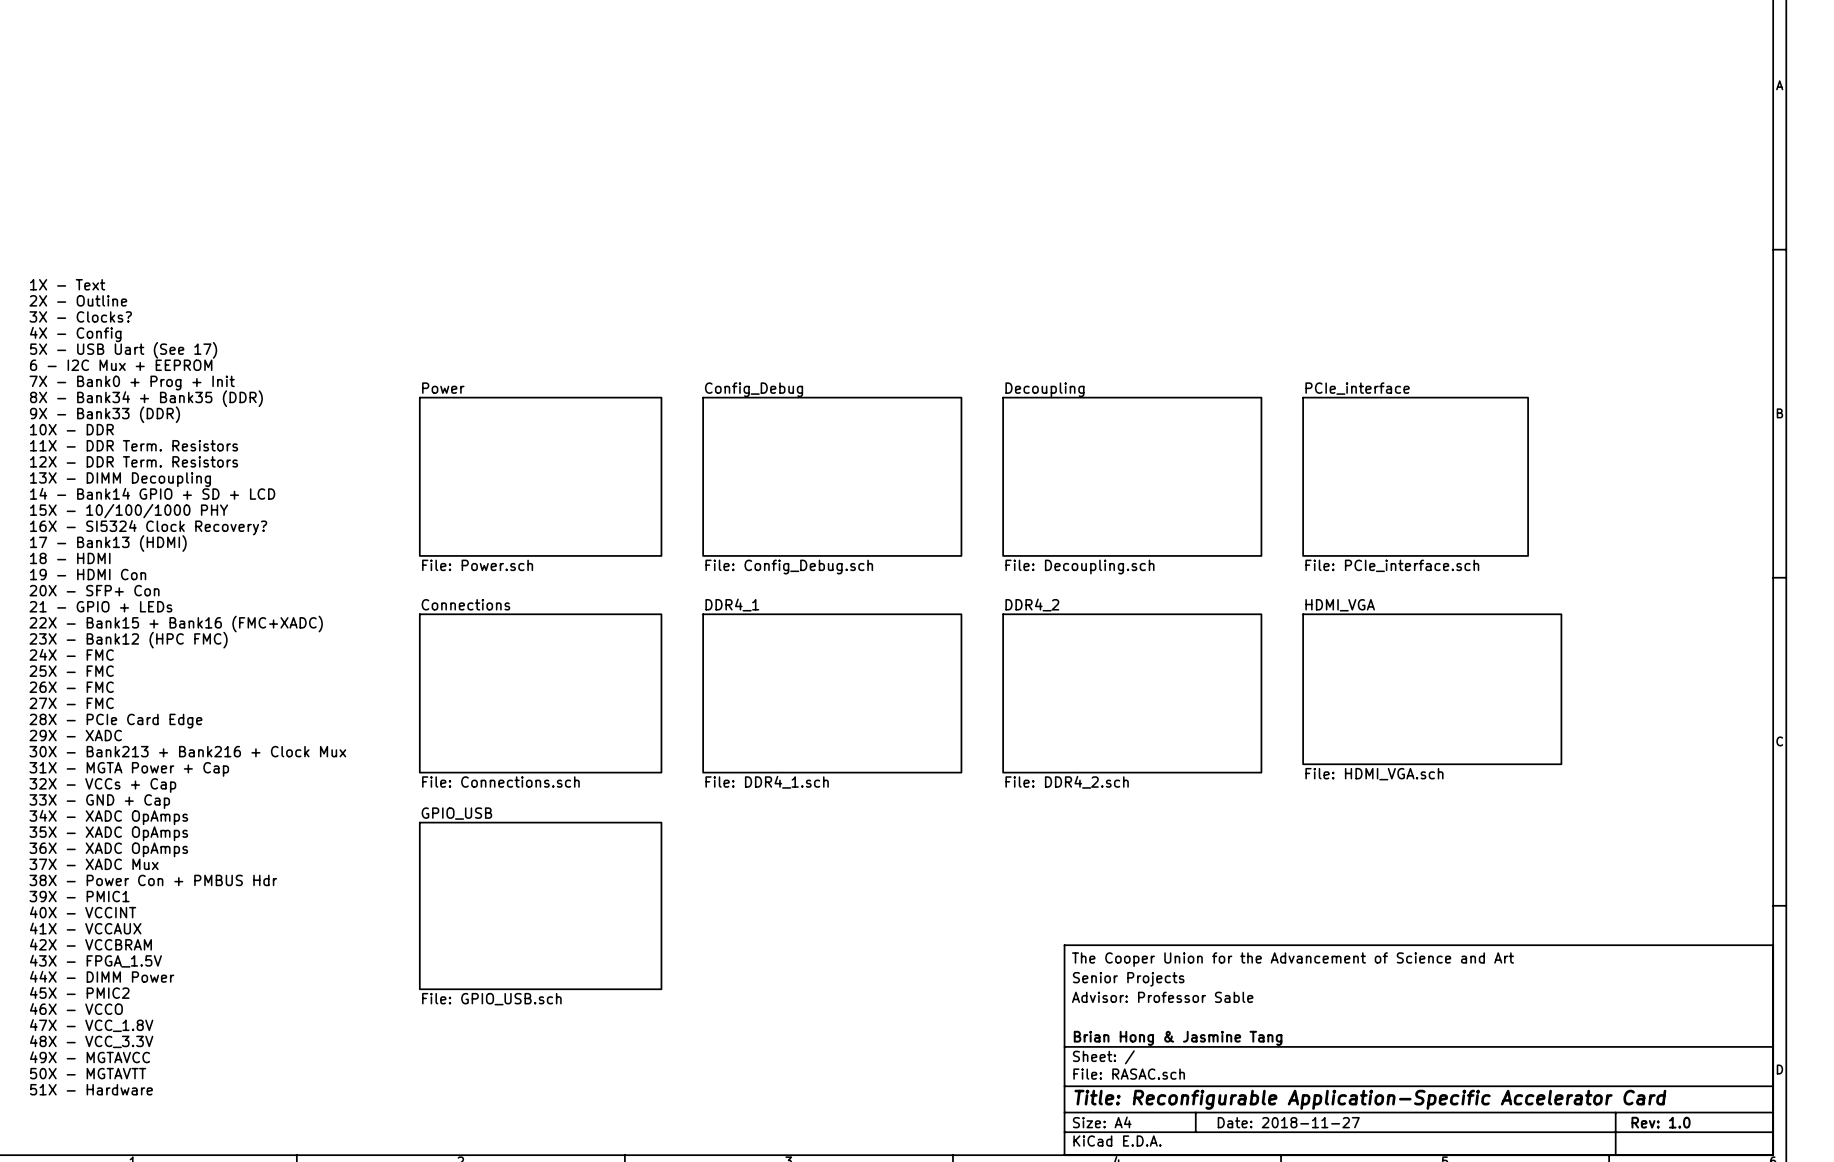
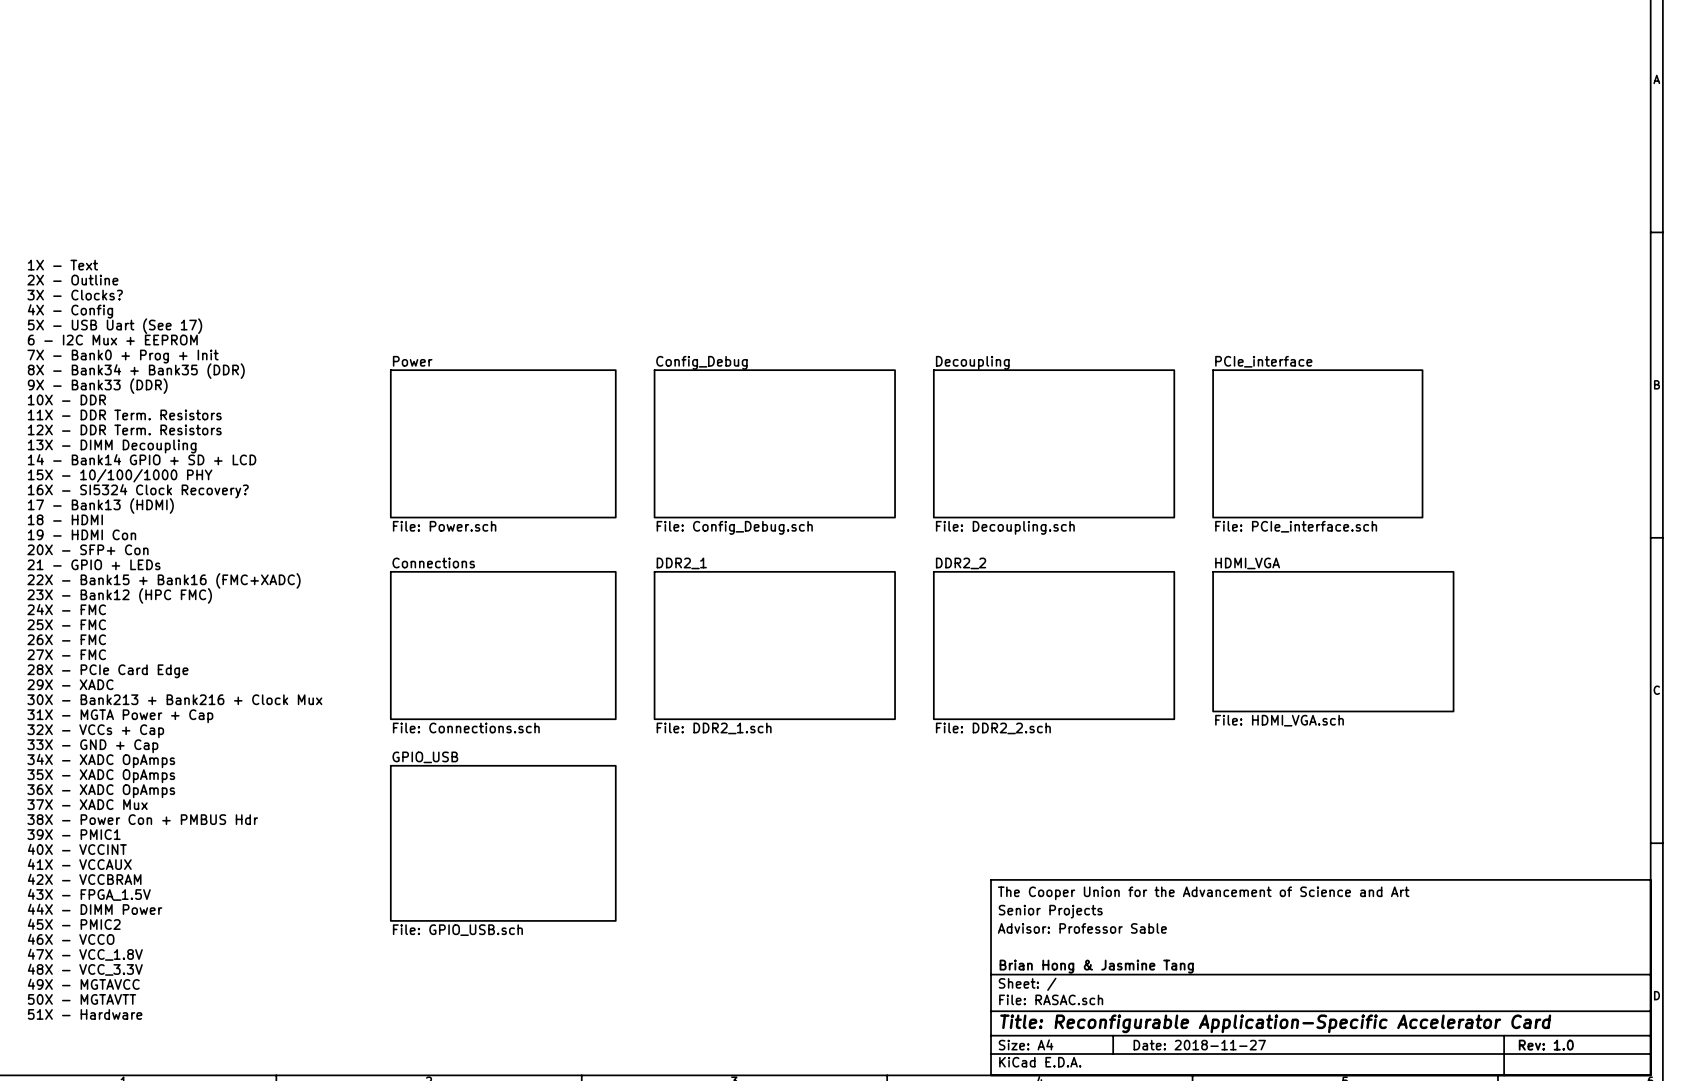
sheet DDR4_1 name: DDR4_1 (732, 605) -> DDR2_1 (681, 563)
sheet DDR4_2 name: DDR4_2 (1032, 605) -> DDR2_2 (961, 563)
sheet DDR4_1 value: File: DDR4_1.sch (767, 782) -> File: DDR2_1.sch (714, 728)
sheet DDR4_2 value: File: DDR4_2.sch (1067, 782) -> File: DDR2_2.sch (993, 728)

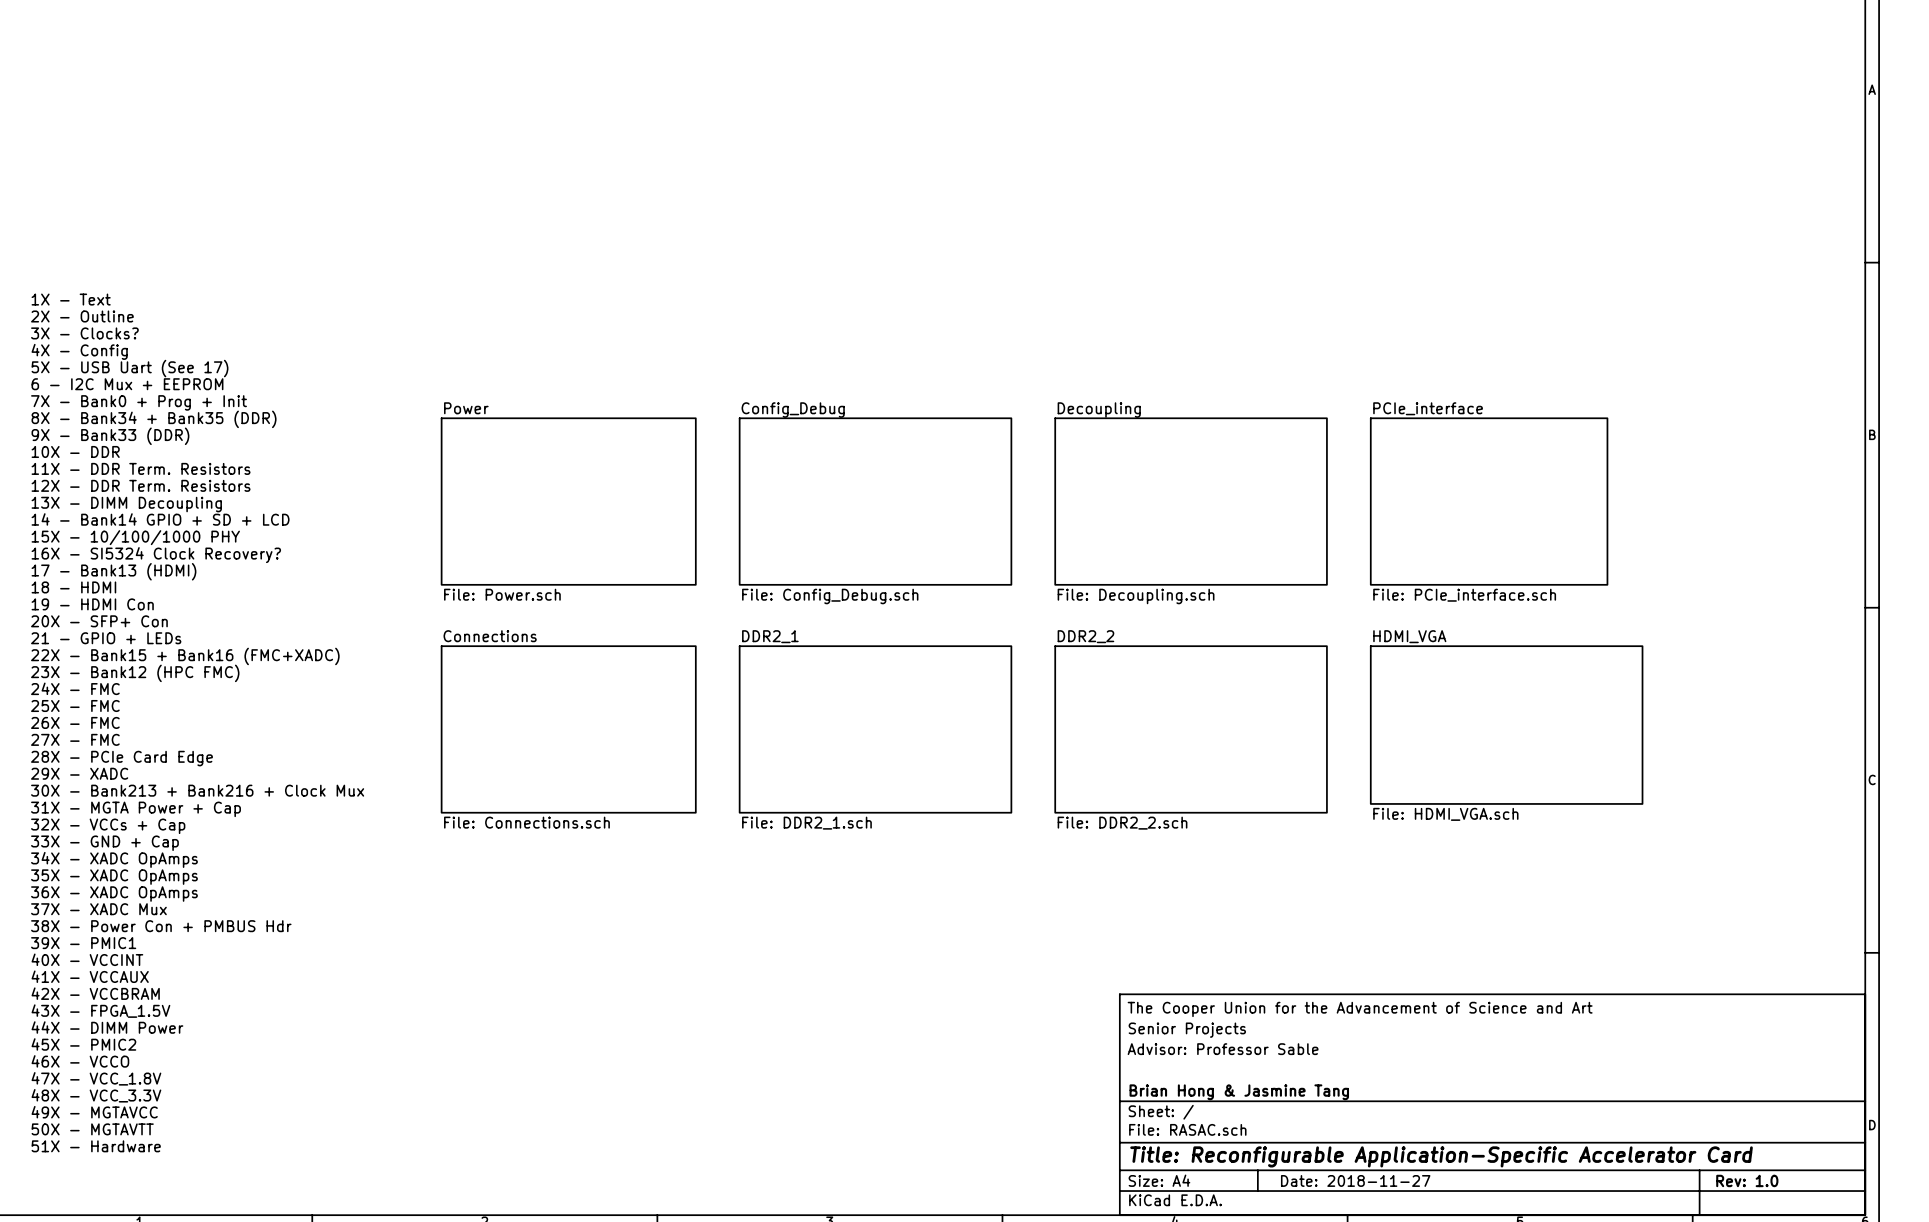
sheet GPIO_USB: File: GPIO_USB.sch (503, 843) -> none

